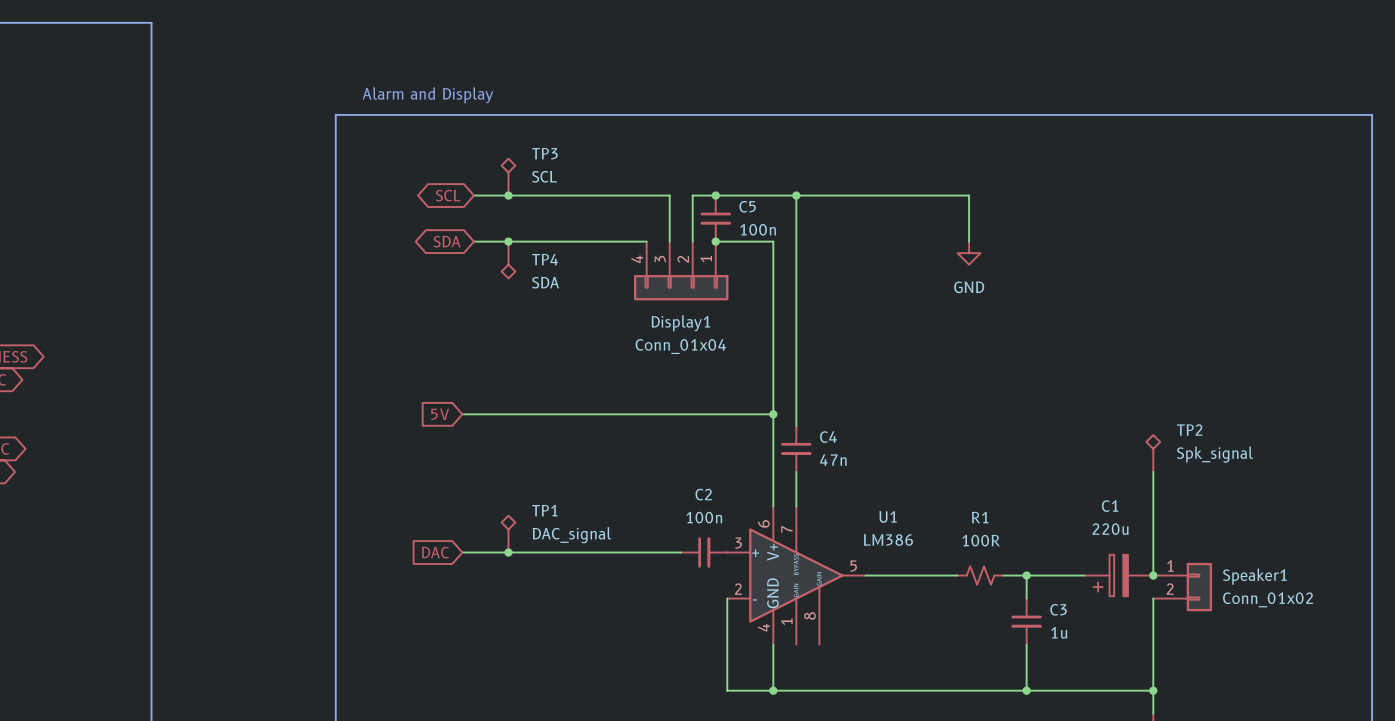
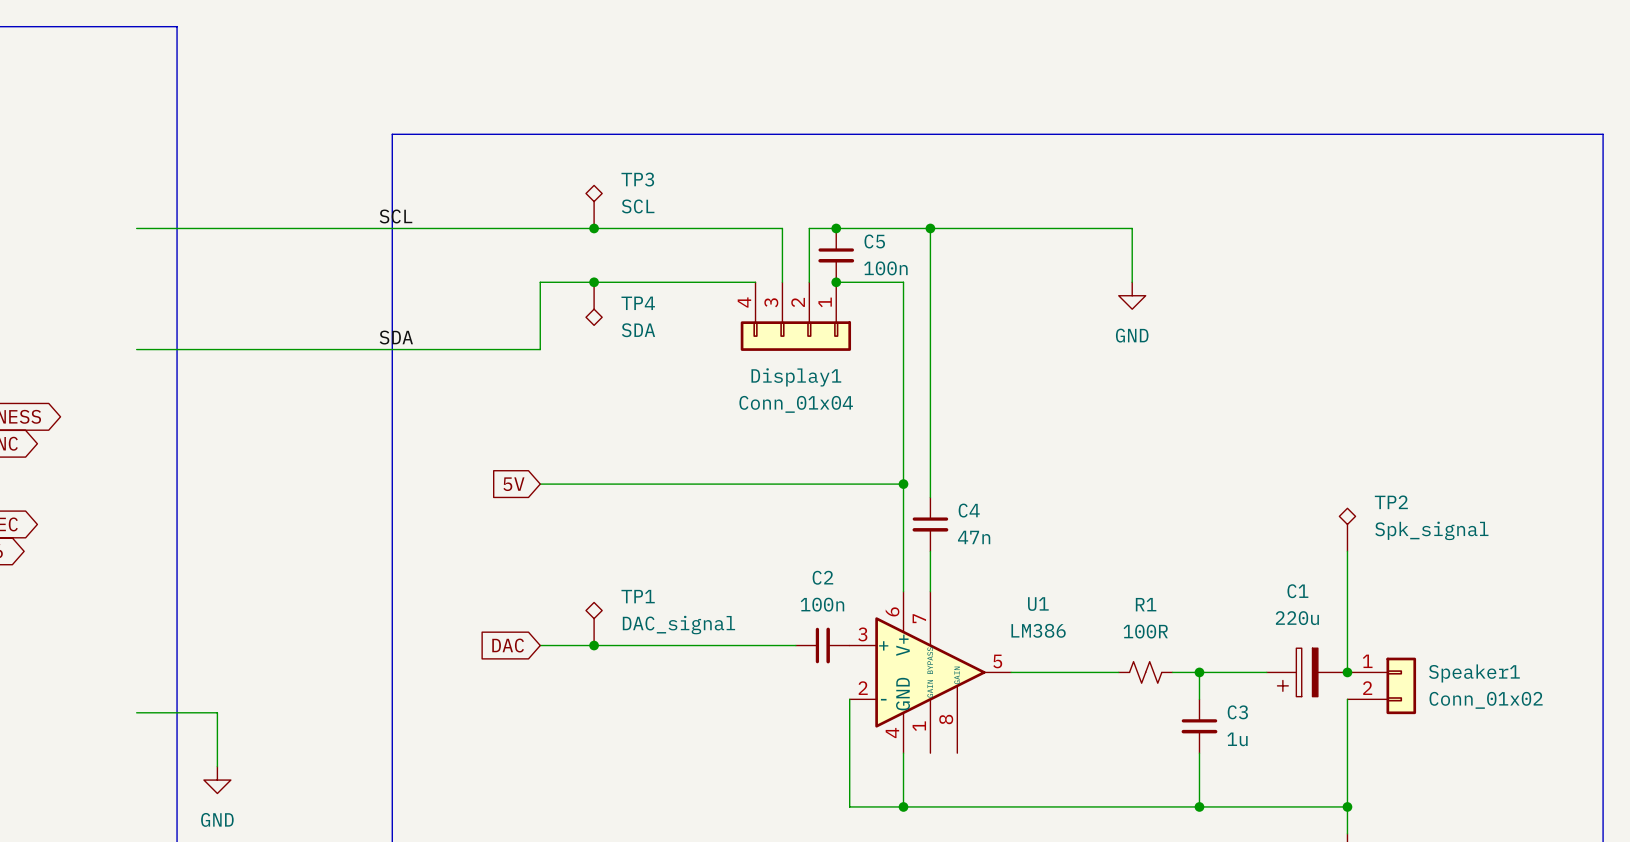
text: Alarm and Display (427, 95) -> none
label: none -> SCL (395, 216)
wire: none -> (136, 228) (553, 228)
global label: SCL (448, 195) -> none
global label: SDA (447, 241) -> none
wire: none -> (553, 282) (540, 282) (540, 349) (136, 349)
label: none -> SDA (396, 337)
wire: none -> (136, 712) (217, 712) (217, 766)
power symbol: none -> GND (217, 780)

